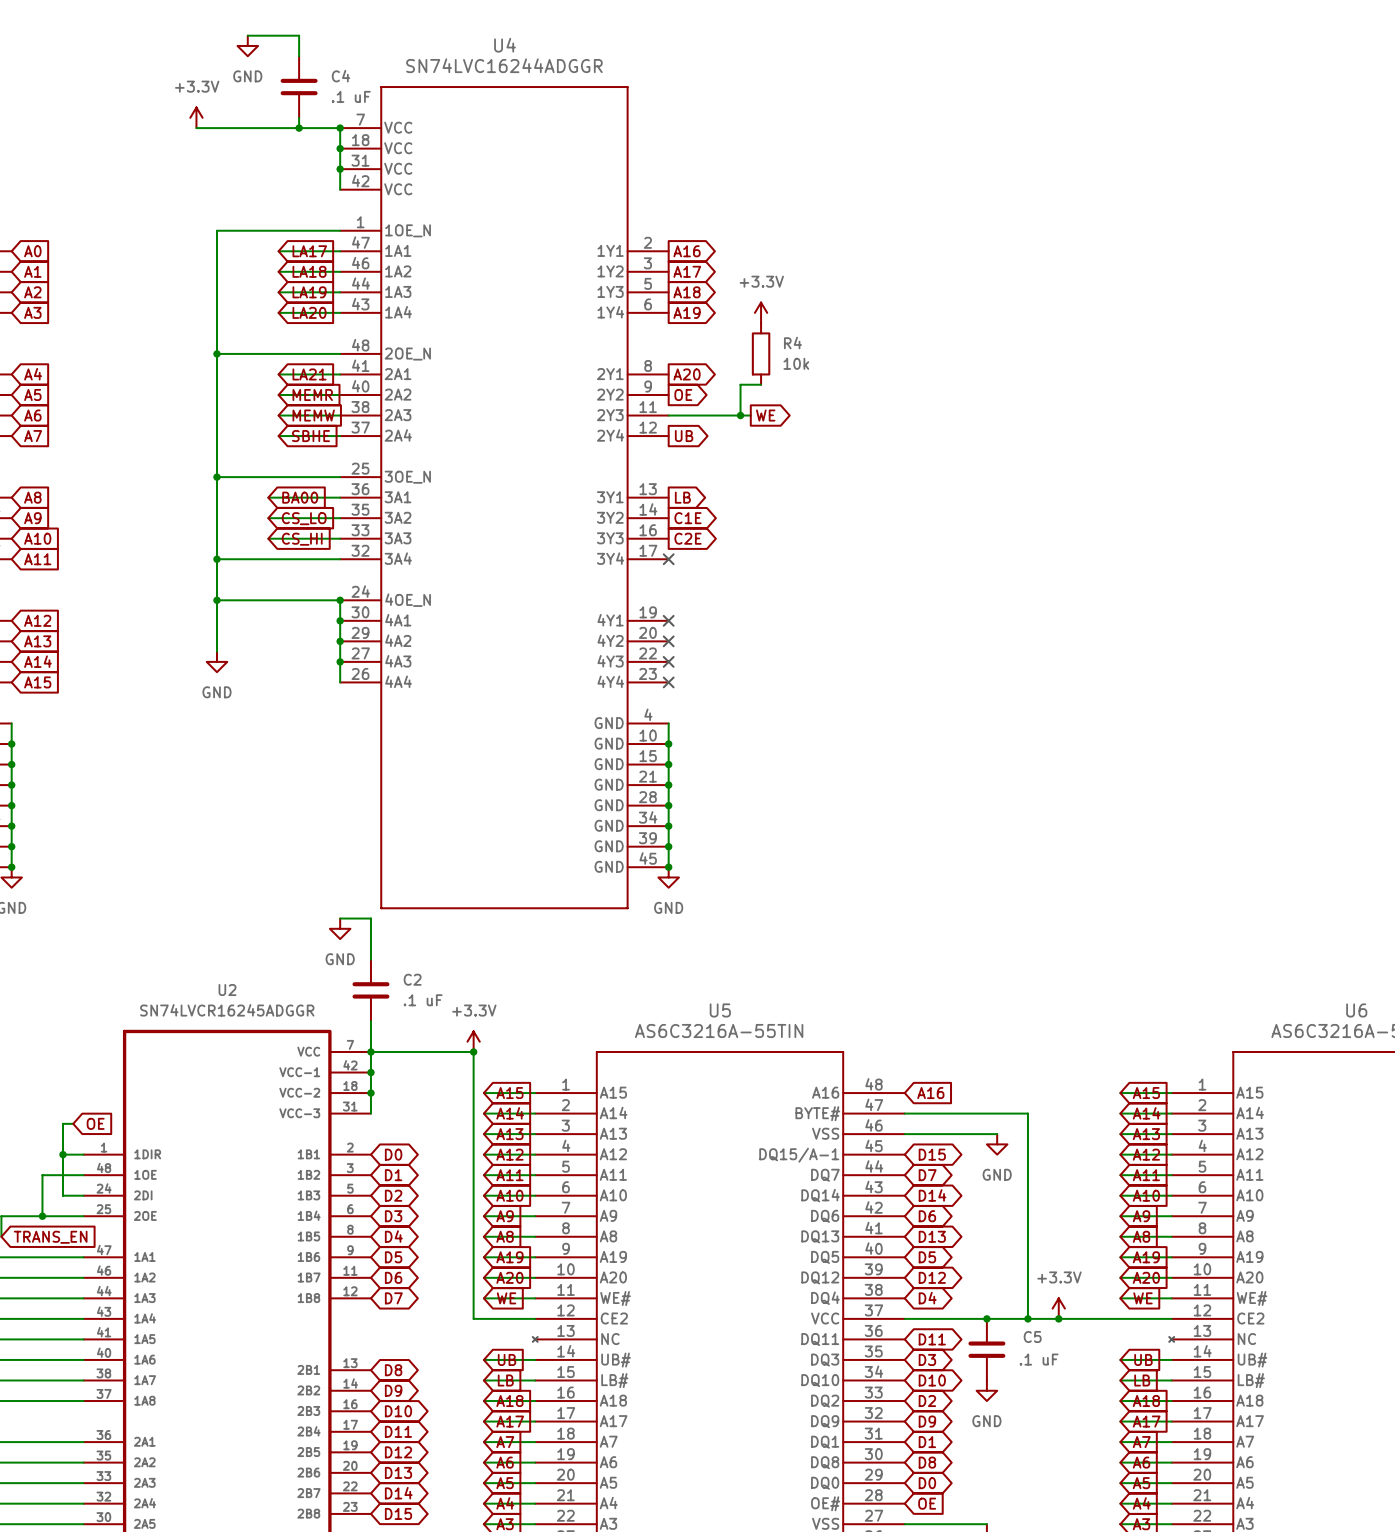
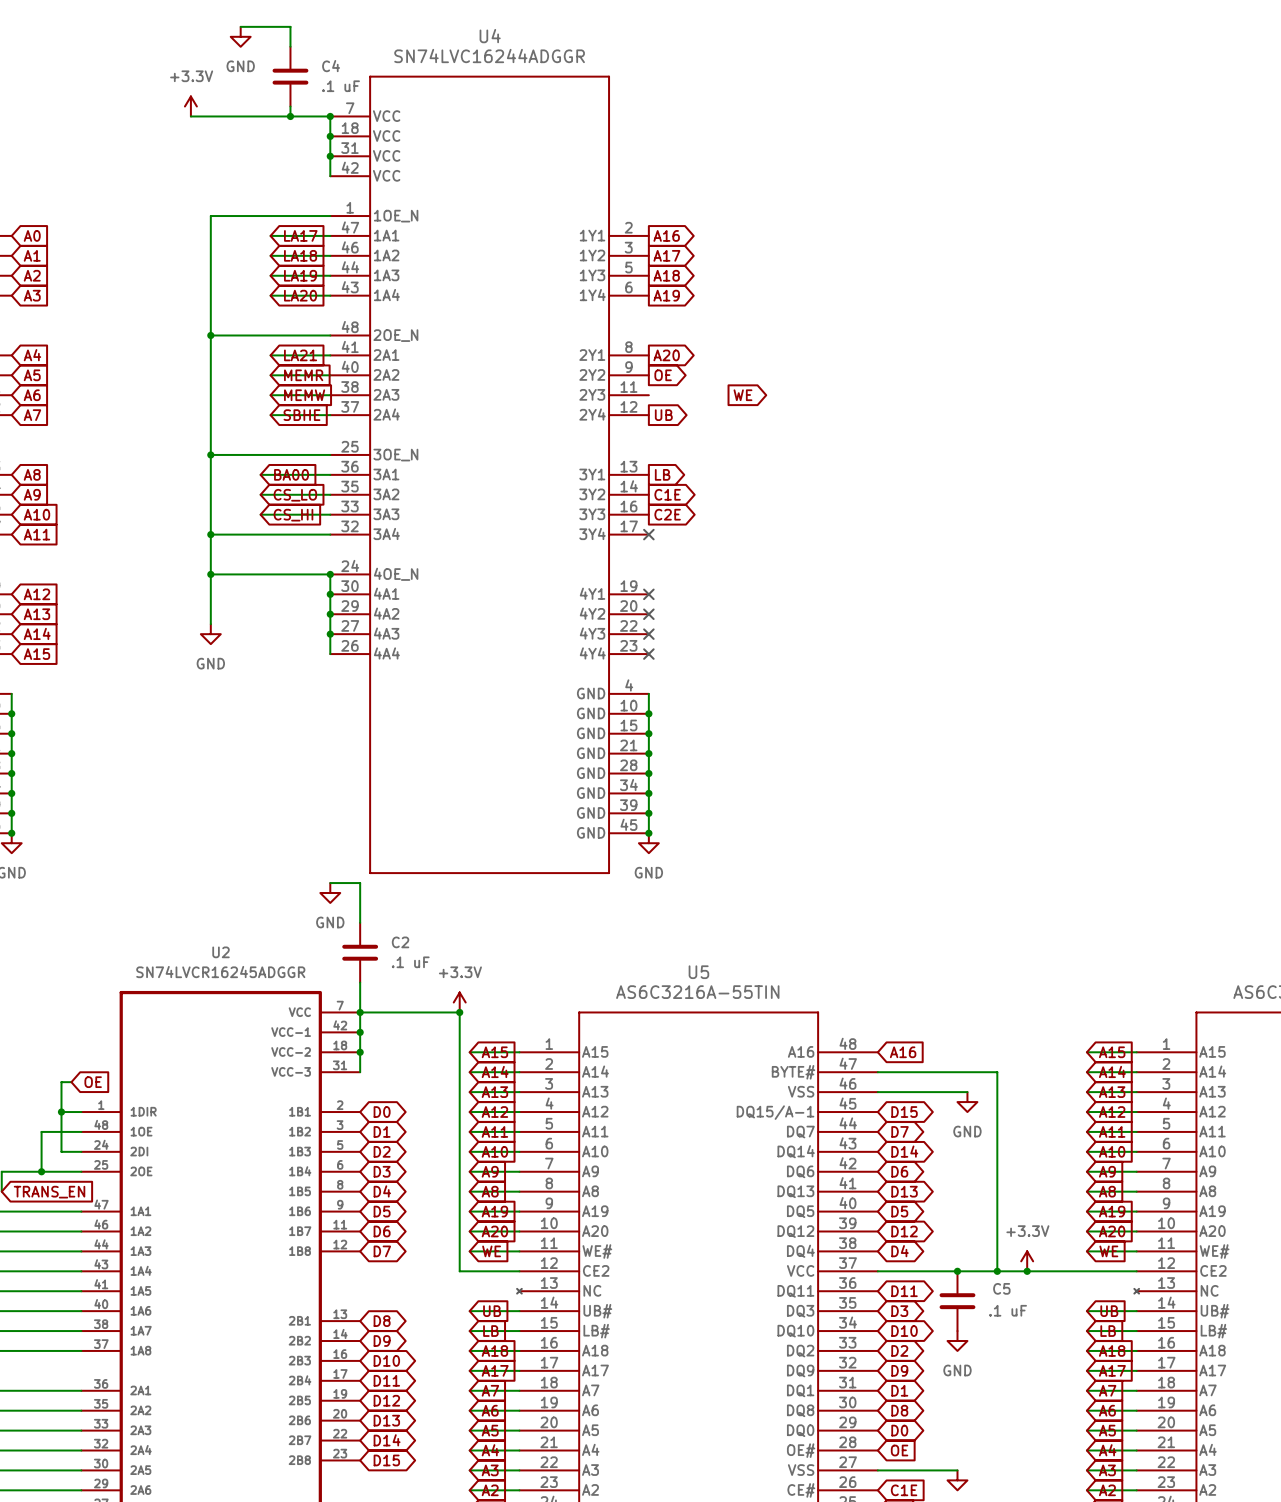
power symbol: +3.3V (761, 312) -> none
R4: 10k (761, 353) -> none
wire: (761, 384) (740, 384) (740, 415) -> none
wire: (668, 415) (750, 415) -> none
junction: (740, 415) -> none

